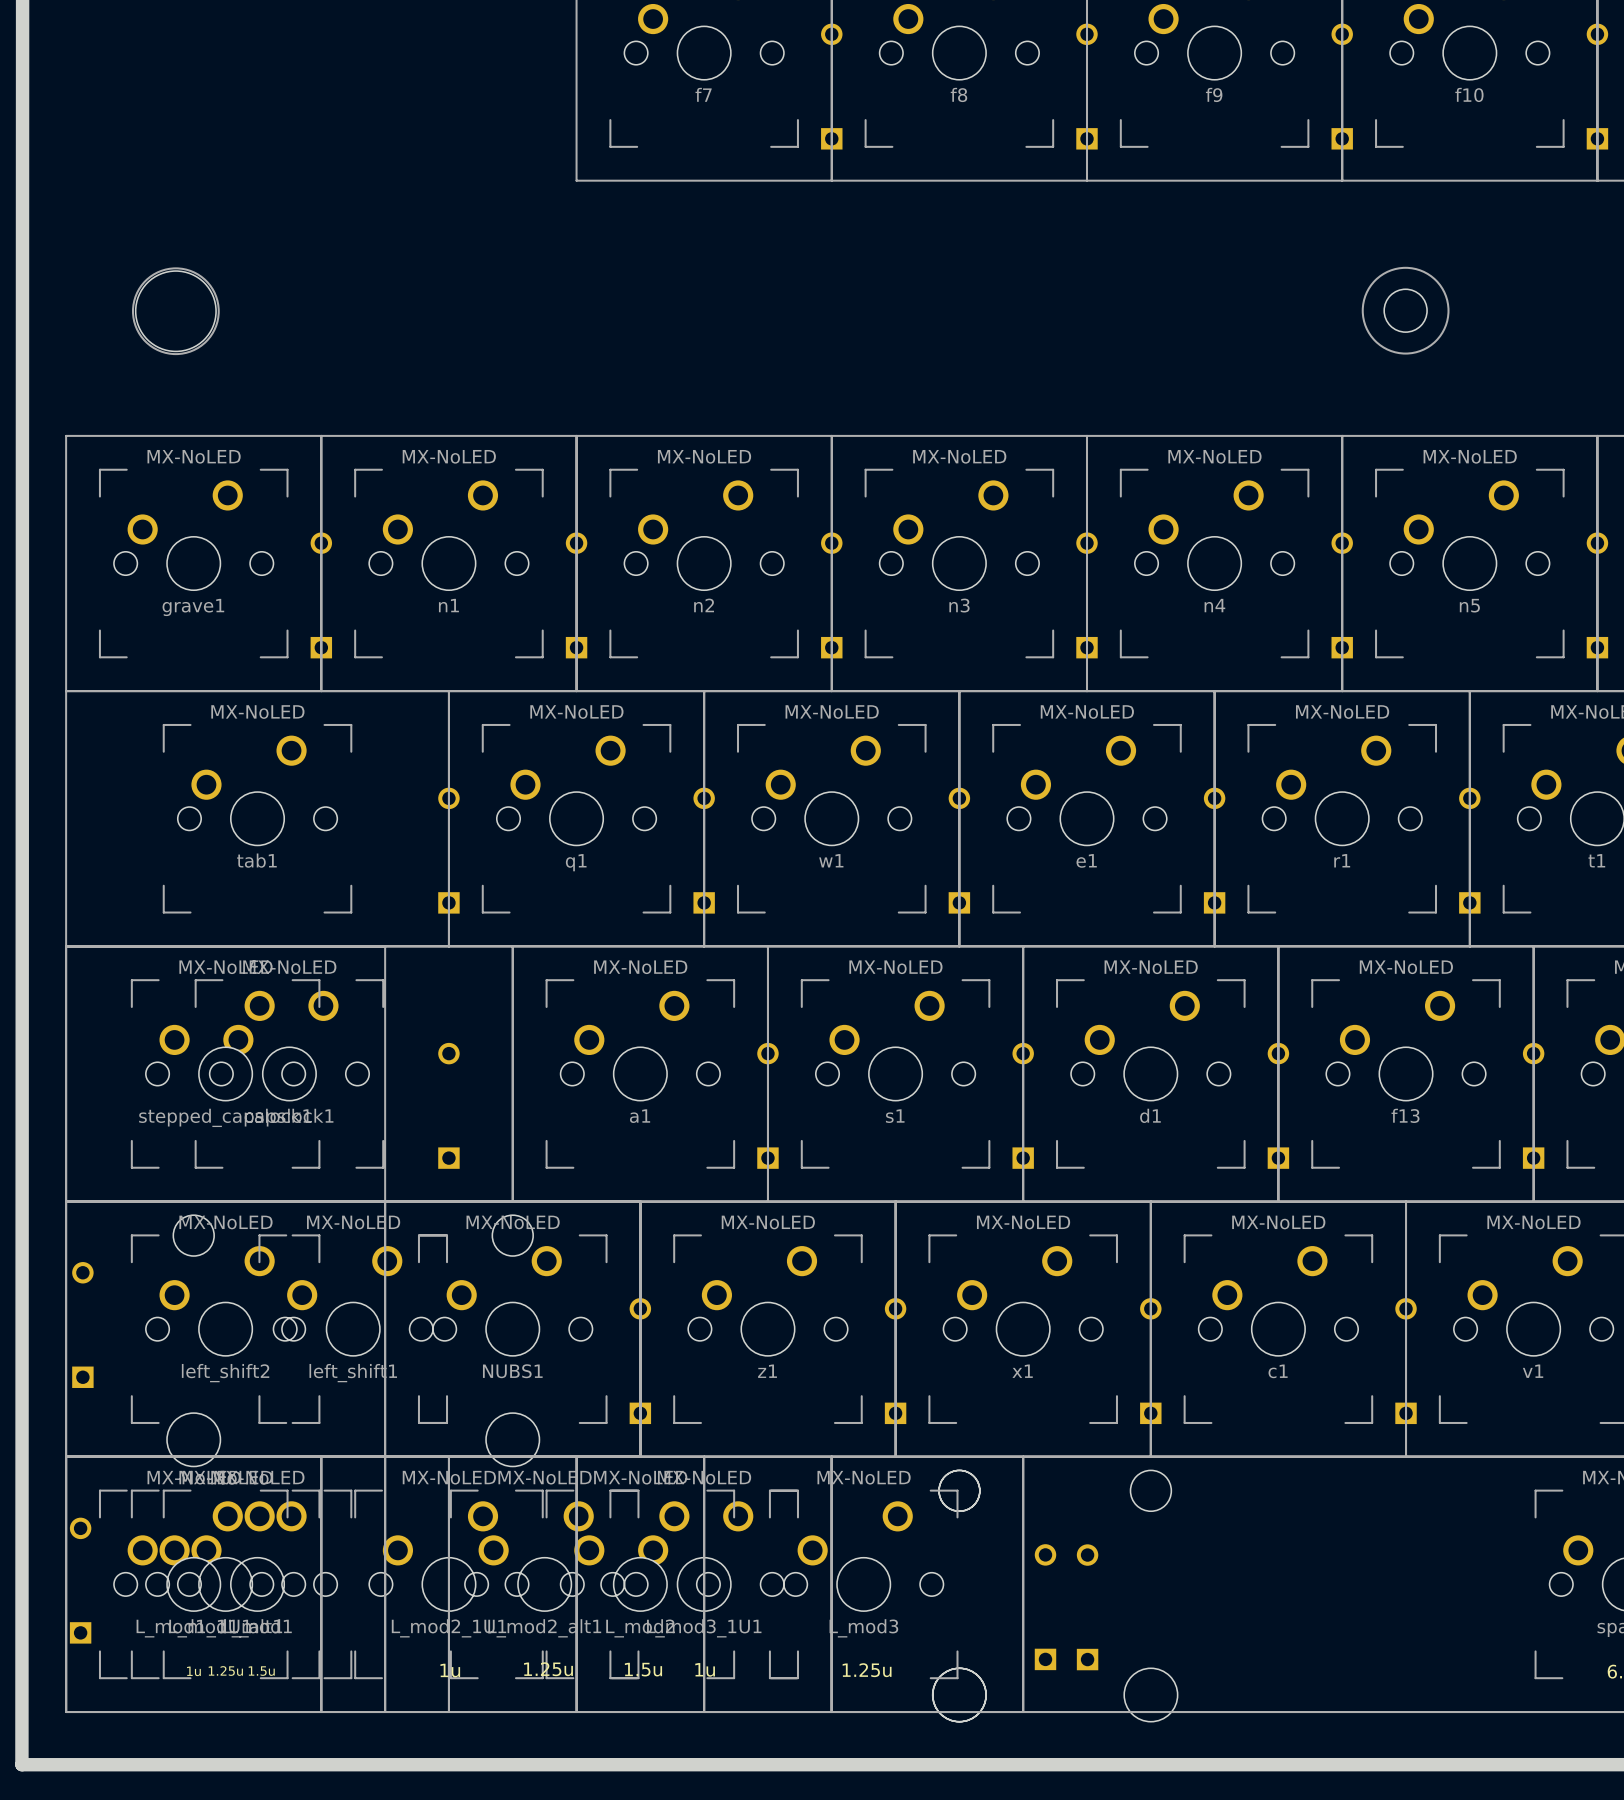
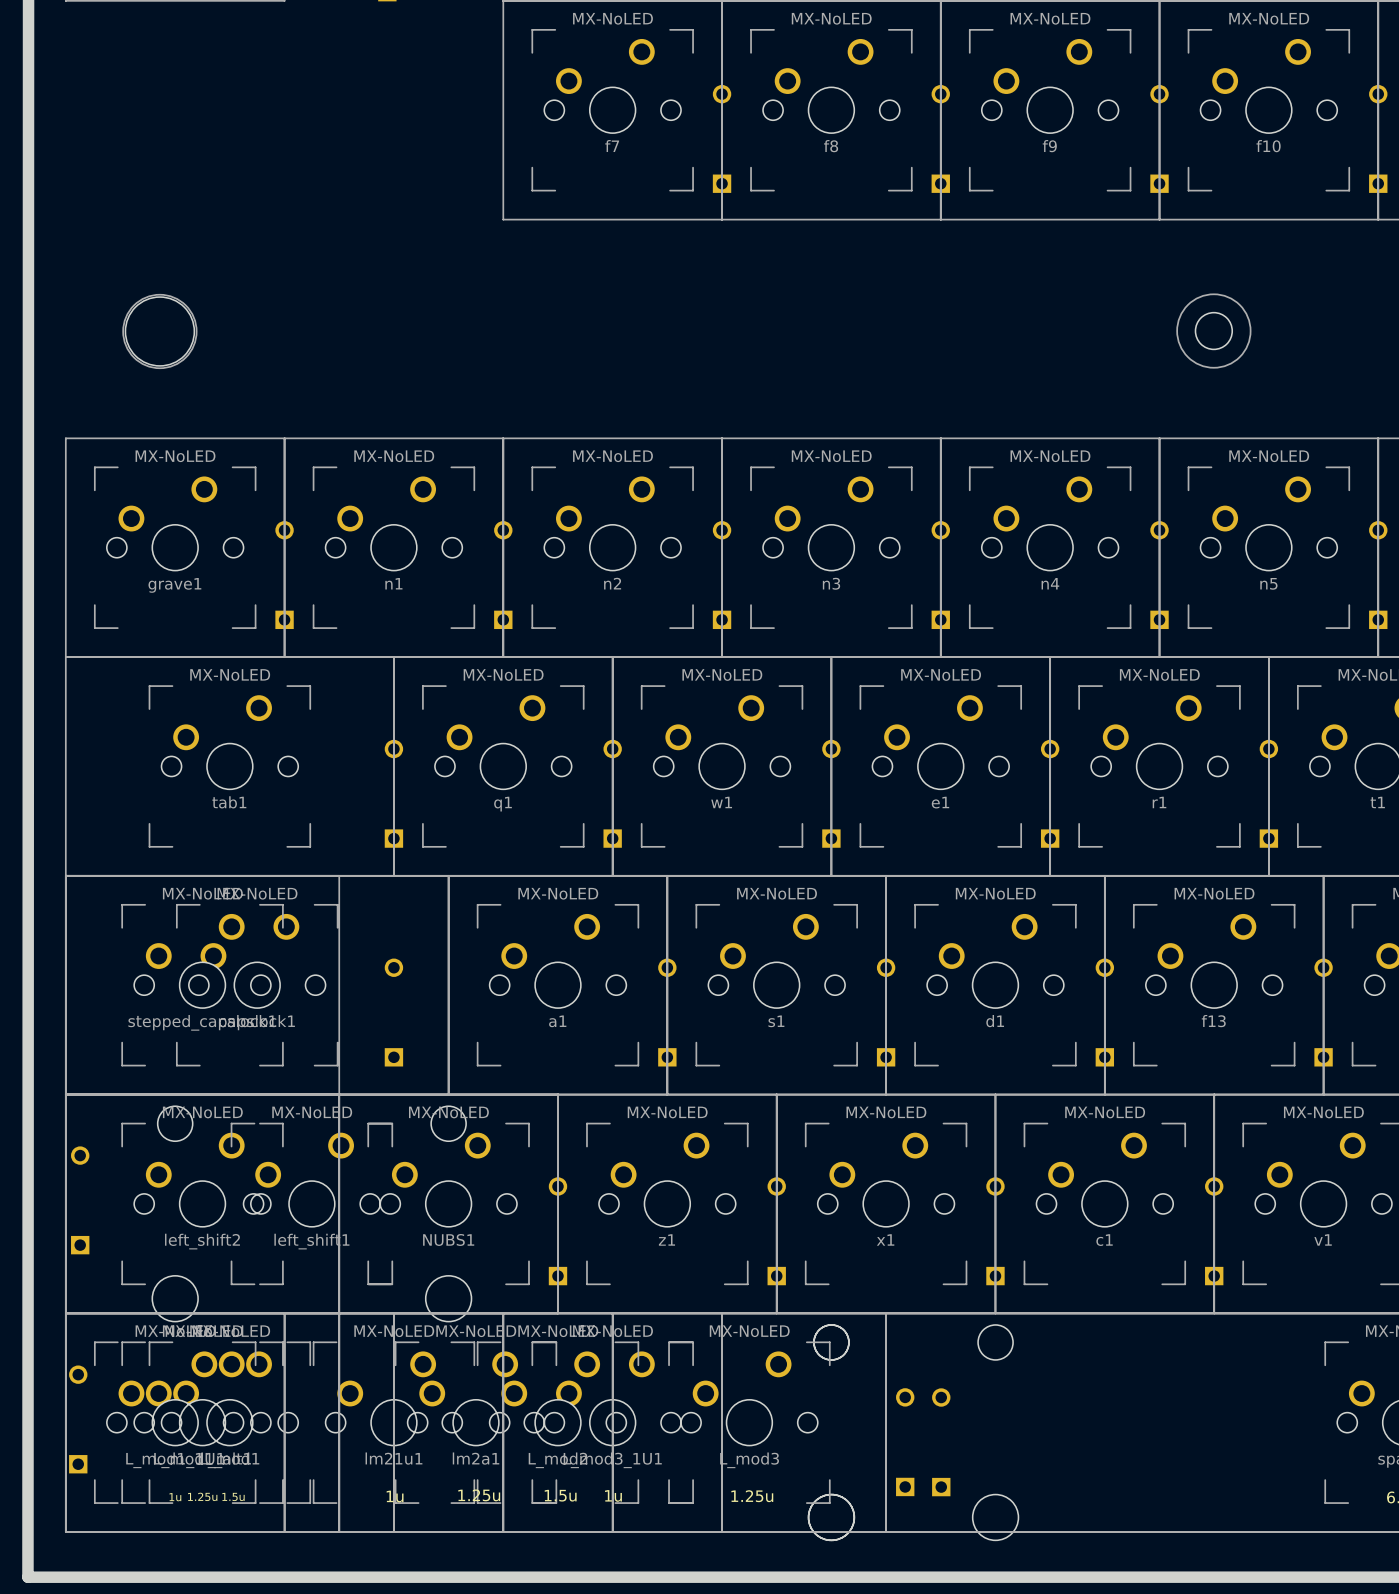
L_mod2_1U1 name: L_mod2_1U1 (449, 1628) -> lm21u1 (393, 1458)
L_mod2_alt1 name: L_mod2_alt1 (544, 1628) -> lm2a1 (476, 1458)

